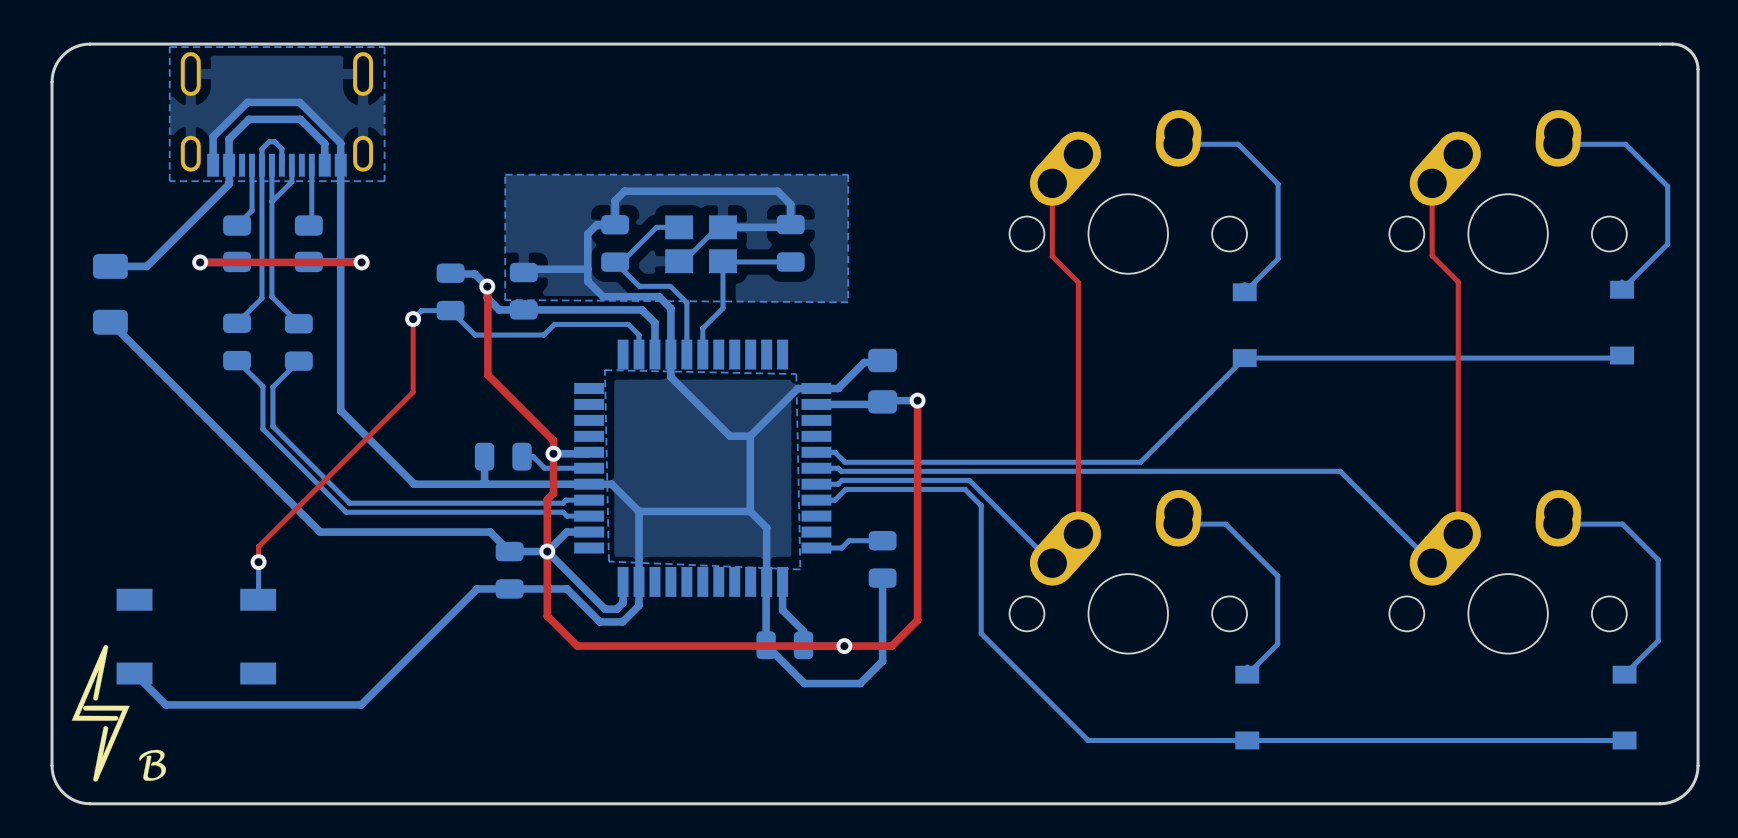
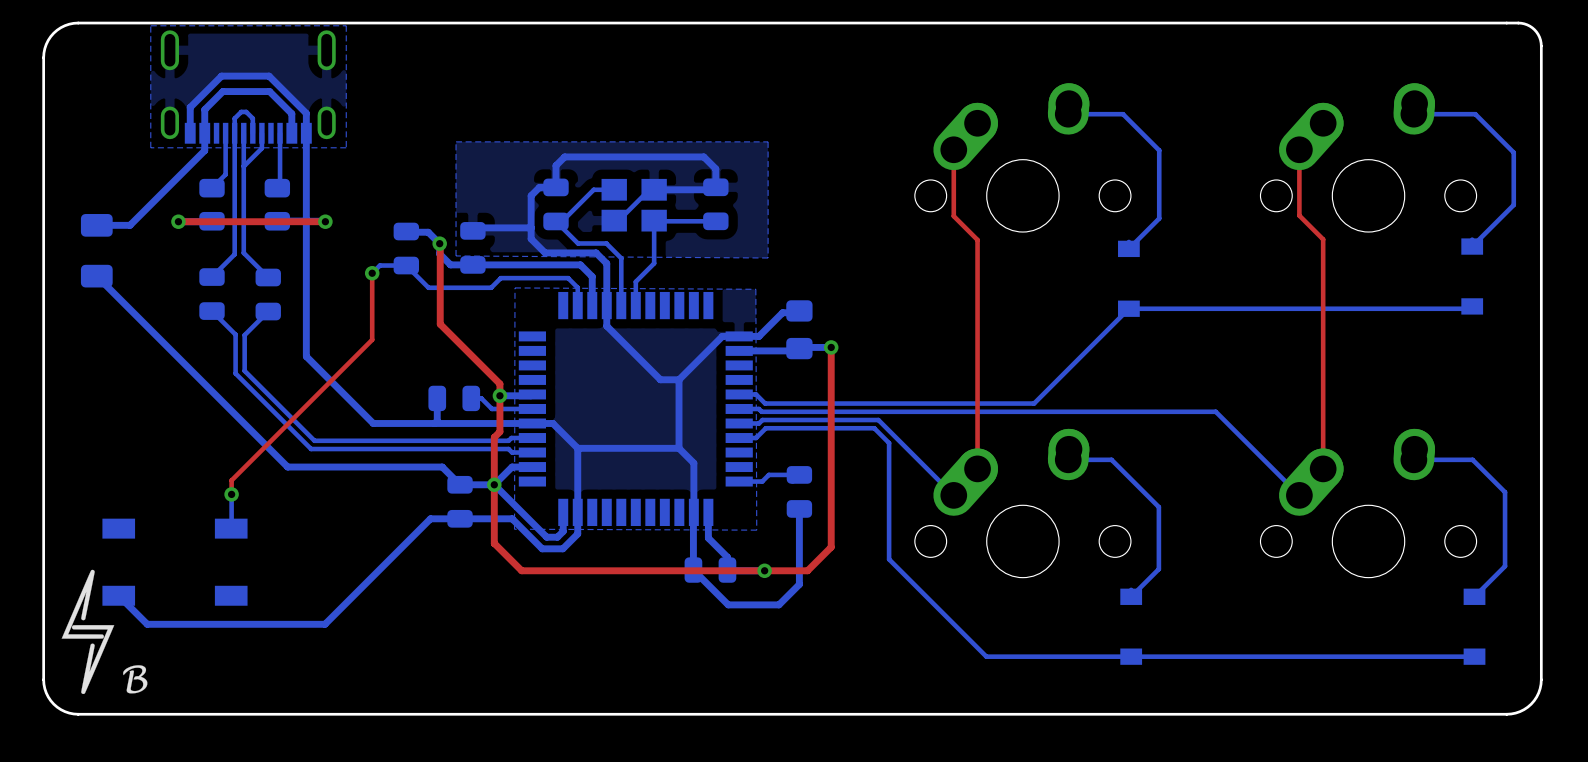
bottom zone outline: (604, 370) (608, 561) (800, 569) (796, 374) (604, 370) -> (514, 287) (514, 529) (756, 530) (755, 289) (514, 287)

